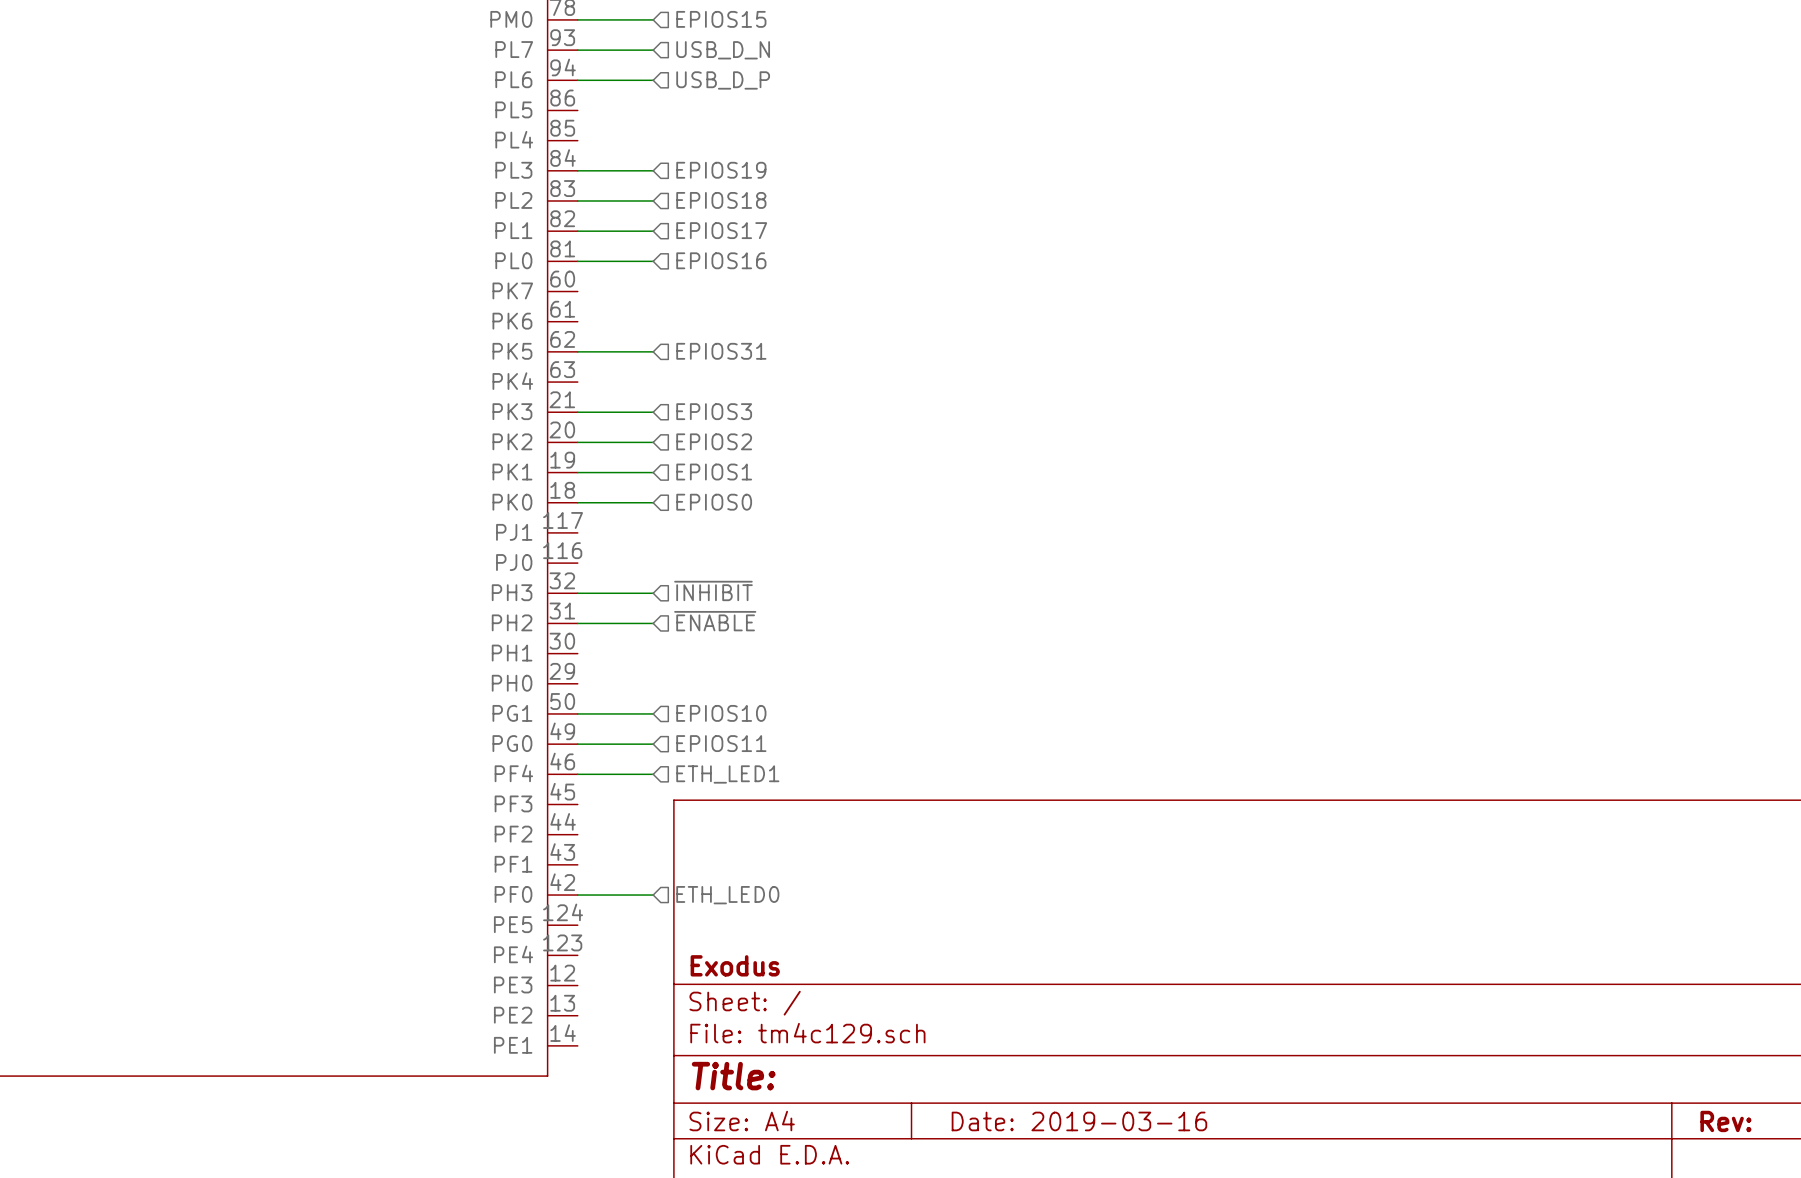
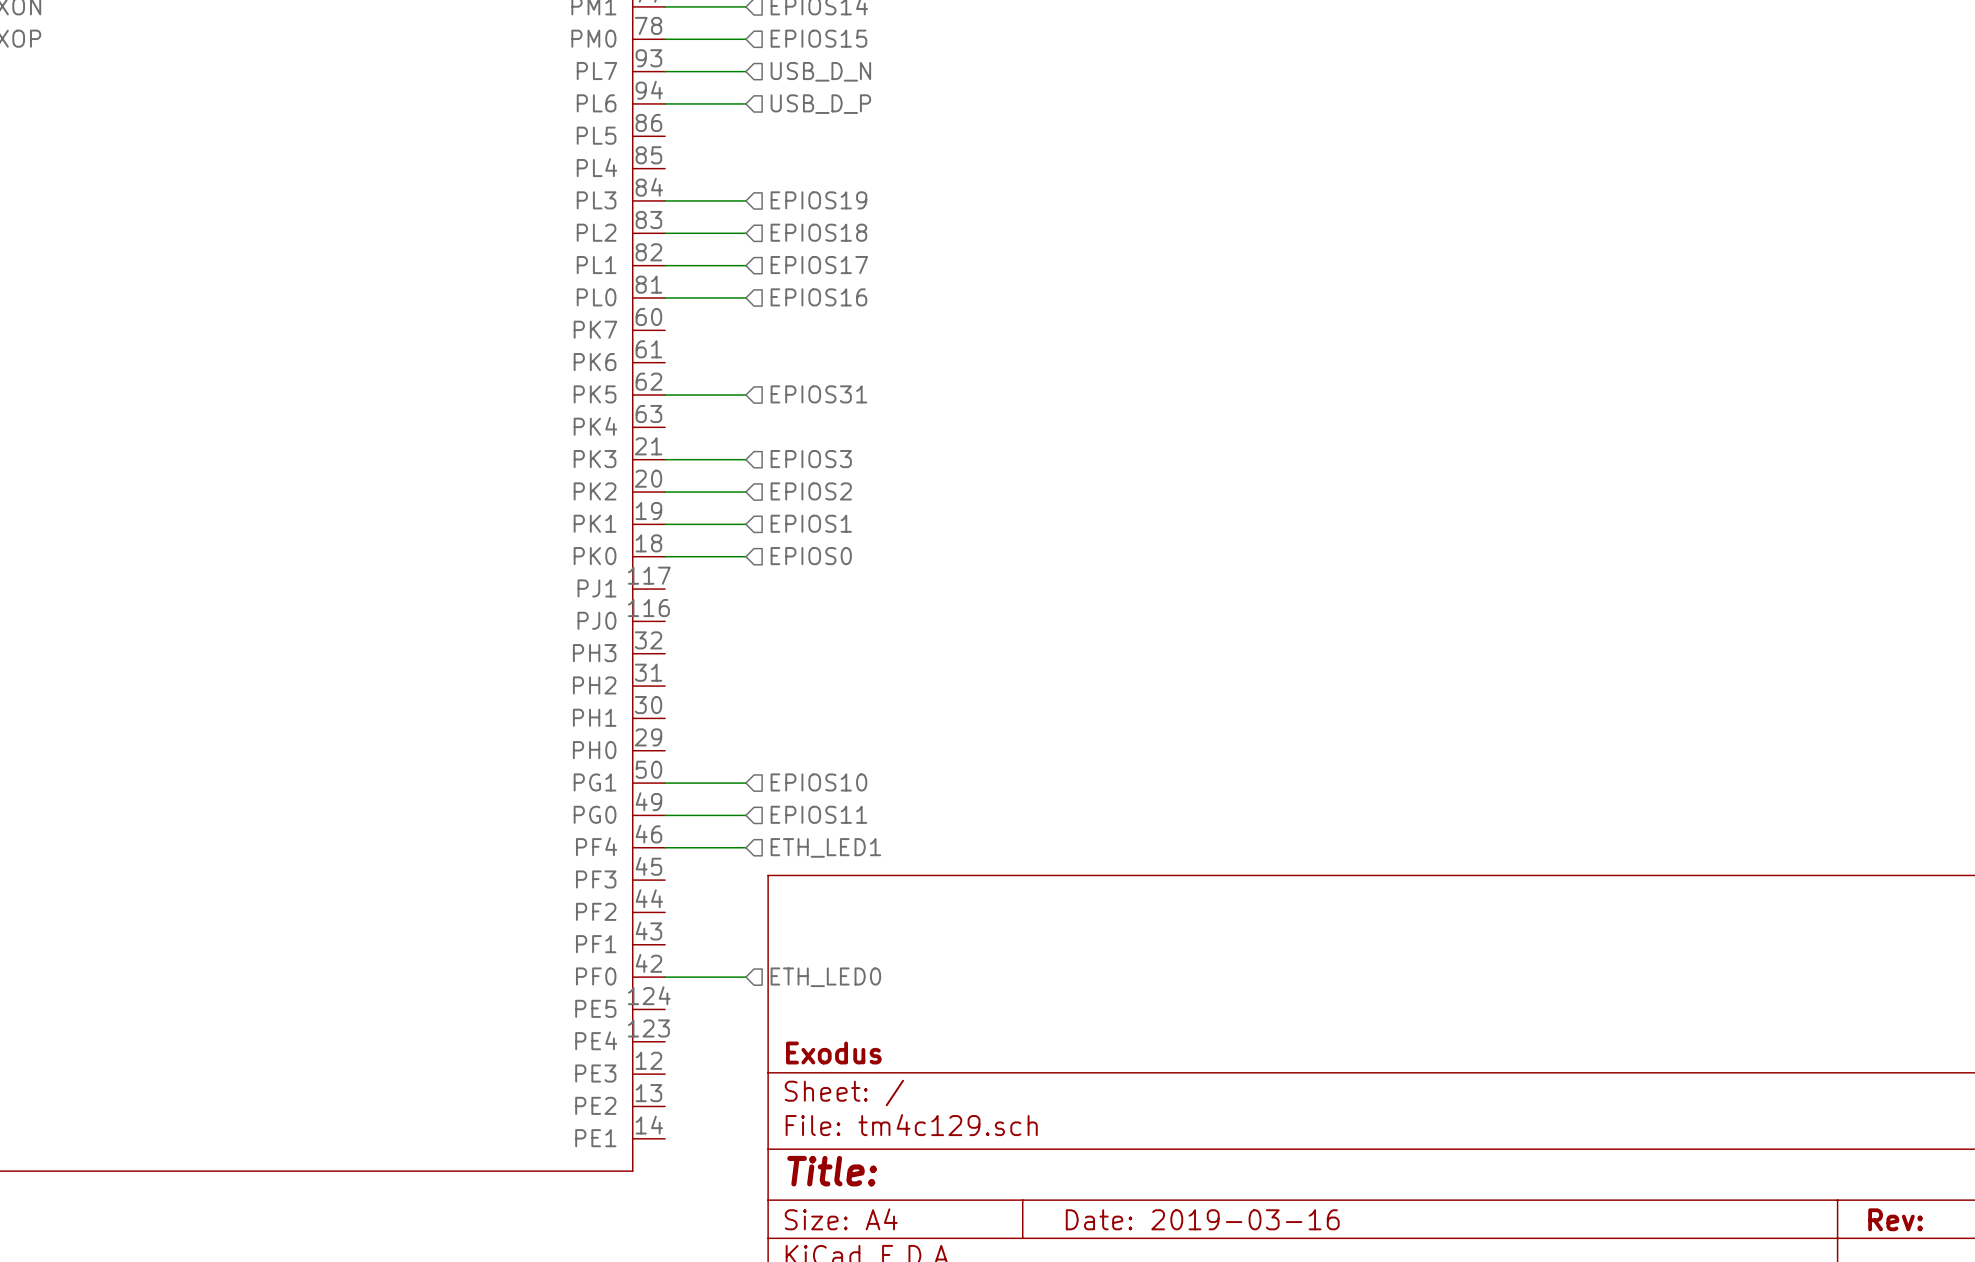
hierarchical label: ~{INHIBIT} (713, 590) -> none
wire: (577, 593) (653, 593) -> none
hierarchical label: ~{ENABLE} (715, 621) -> none
wire: (577, 623) (653, 623) -> none

